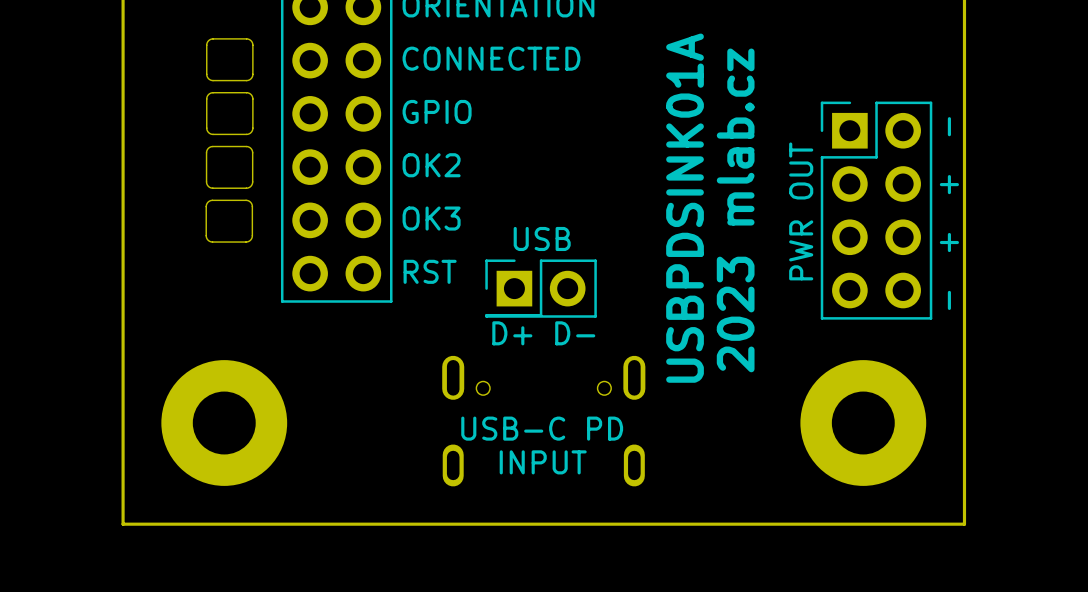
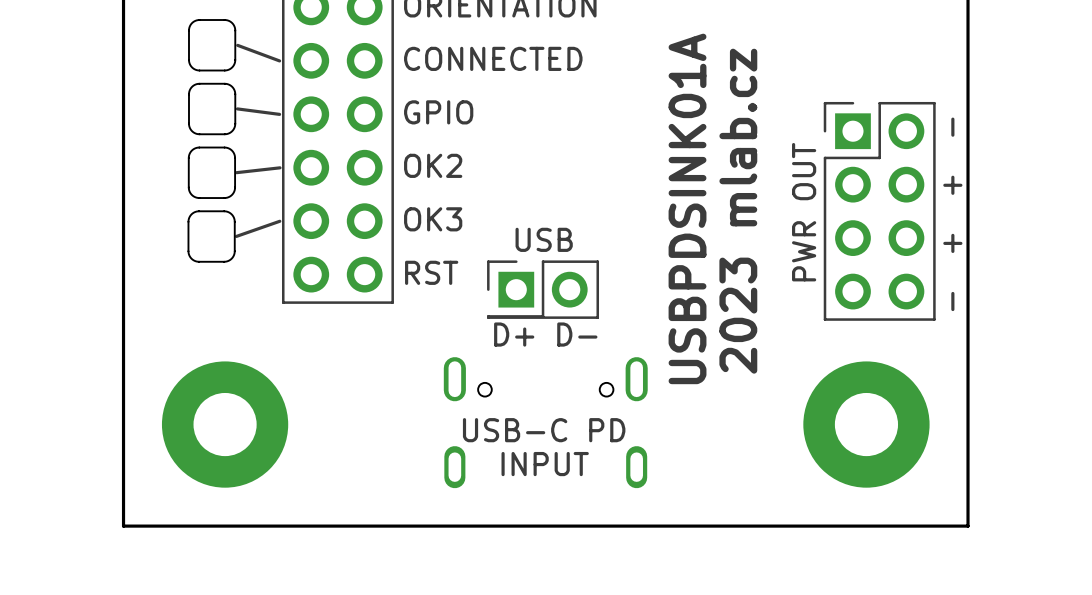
part: none -> (212, 45)
line: none -> (237, 45) (279, 60)
part: (229, 59) -> none
part footprint: [206, 92, 254, 135] -> [188, 83, 236, 135]
line: none -> (237, 108) (279, 114)
part footprint: [206, 146, 254, 189] -> [188, 146, 236, 199]
line: none -> (280, 167) (236, 172)
line: none -> (279, 221) (236, 236)
part: (229, 221) -> none
part: none -> (211, 236)

